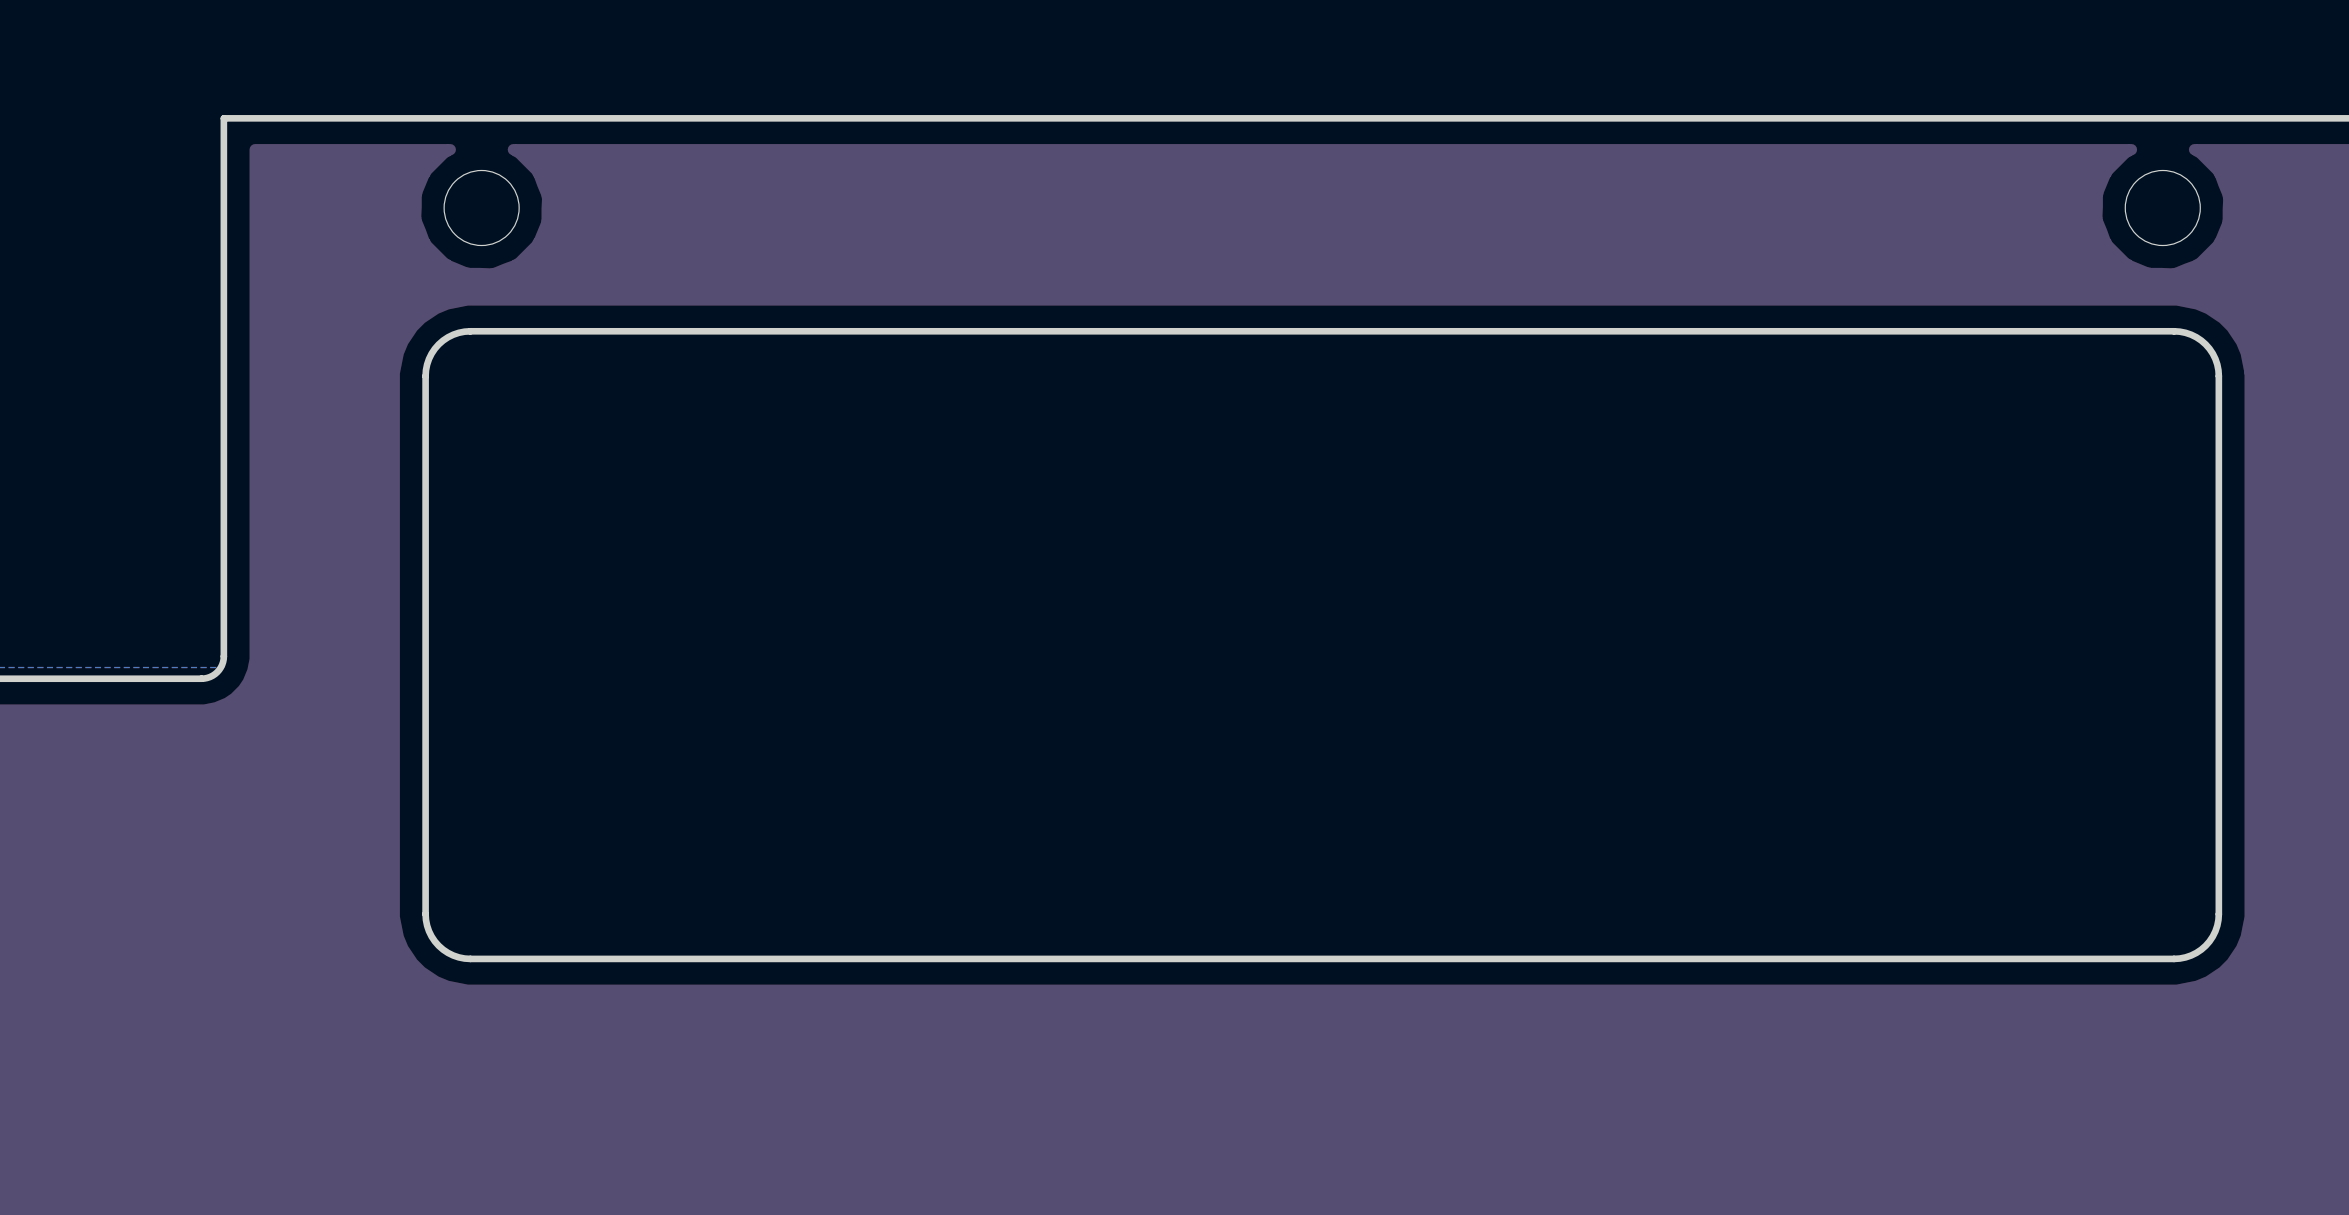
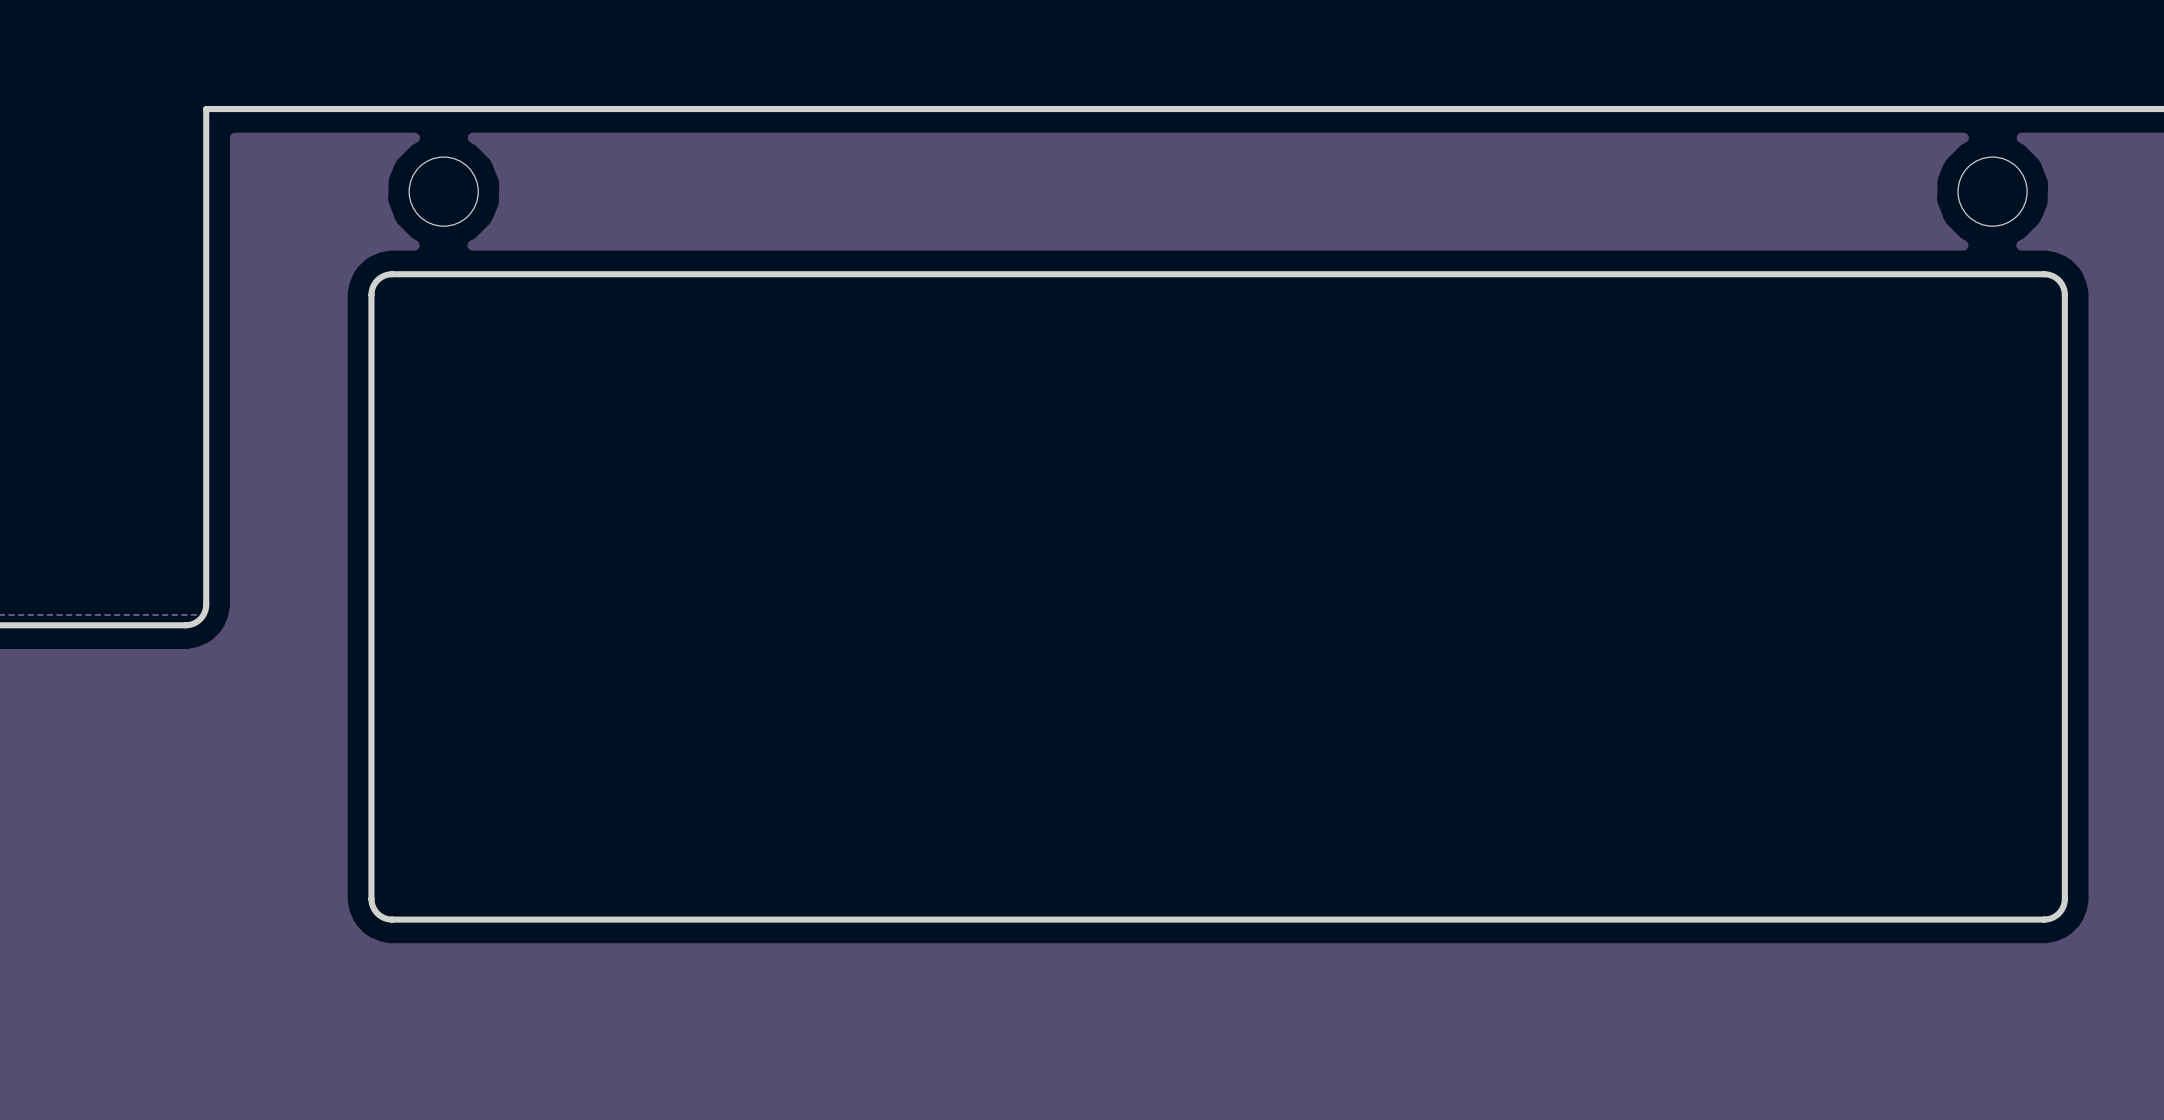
board edge: (2174, 331) (470, 331) (453, 334) (443, 340) (434, 348) (427, 364) (425, 376) (425, 914) (429, 931) (434, 941) (448, 952) (458, 957) (470, 958) (2174, 958) (2191, 955) (2201, 949) (2209, 941) (2215, 931) (2218, 914) (2218, 376) (2215, 358) (2205, 344) (2191, 334) (2174, 331) -> (2044, 274) (2052, 275) (2058, 280) (2063, 286) (2064, 294) (2064, 898) (2062, 909) (2052, 918) (2044, 919) (392, 919) (381, 916) (373, 906) (371, 898) (371, 294) (375, 282) (384, 275) (392, 274) (2044, 274)

